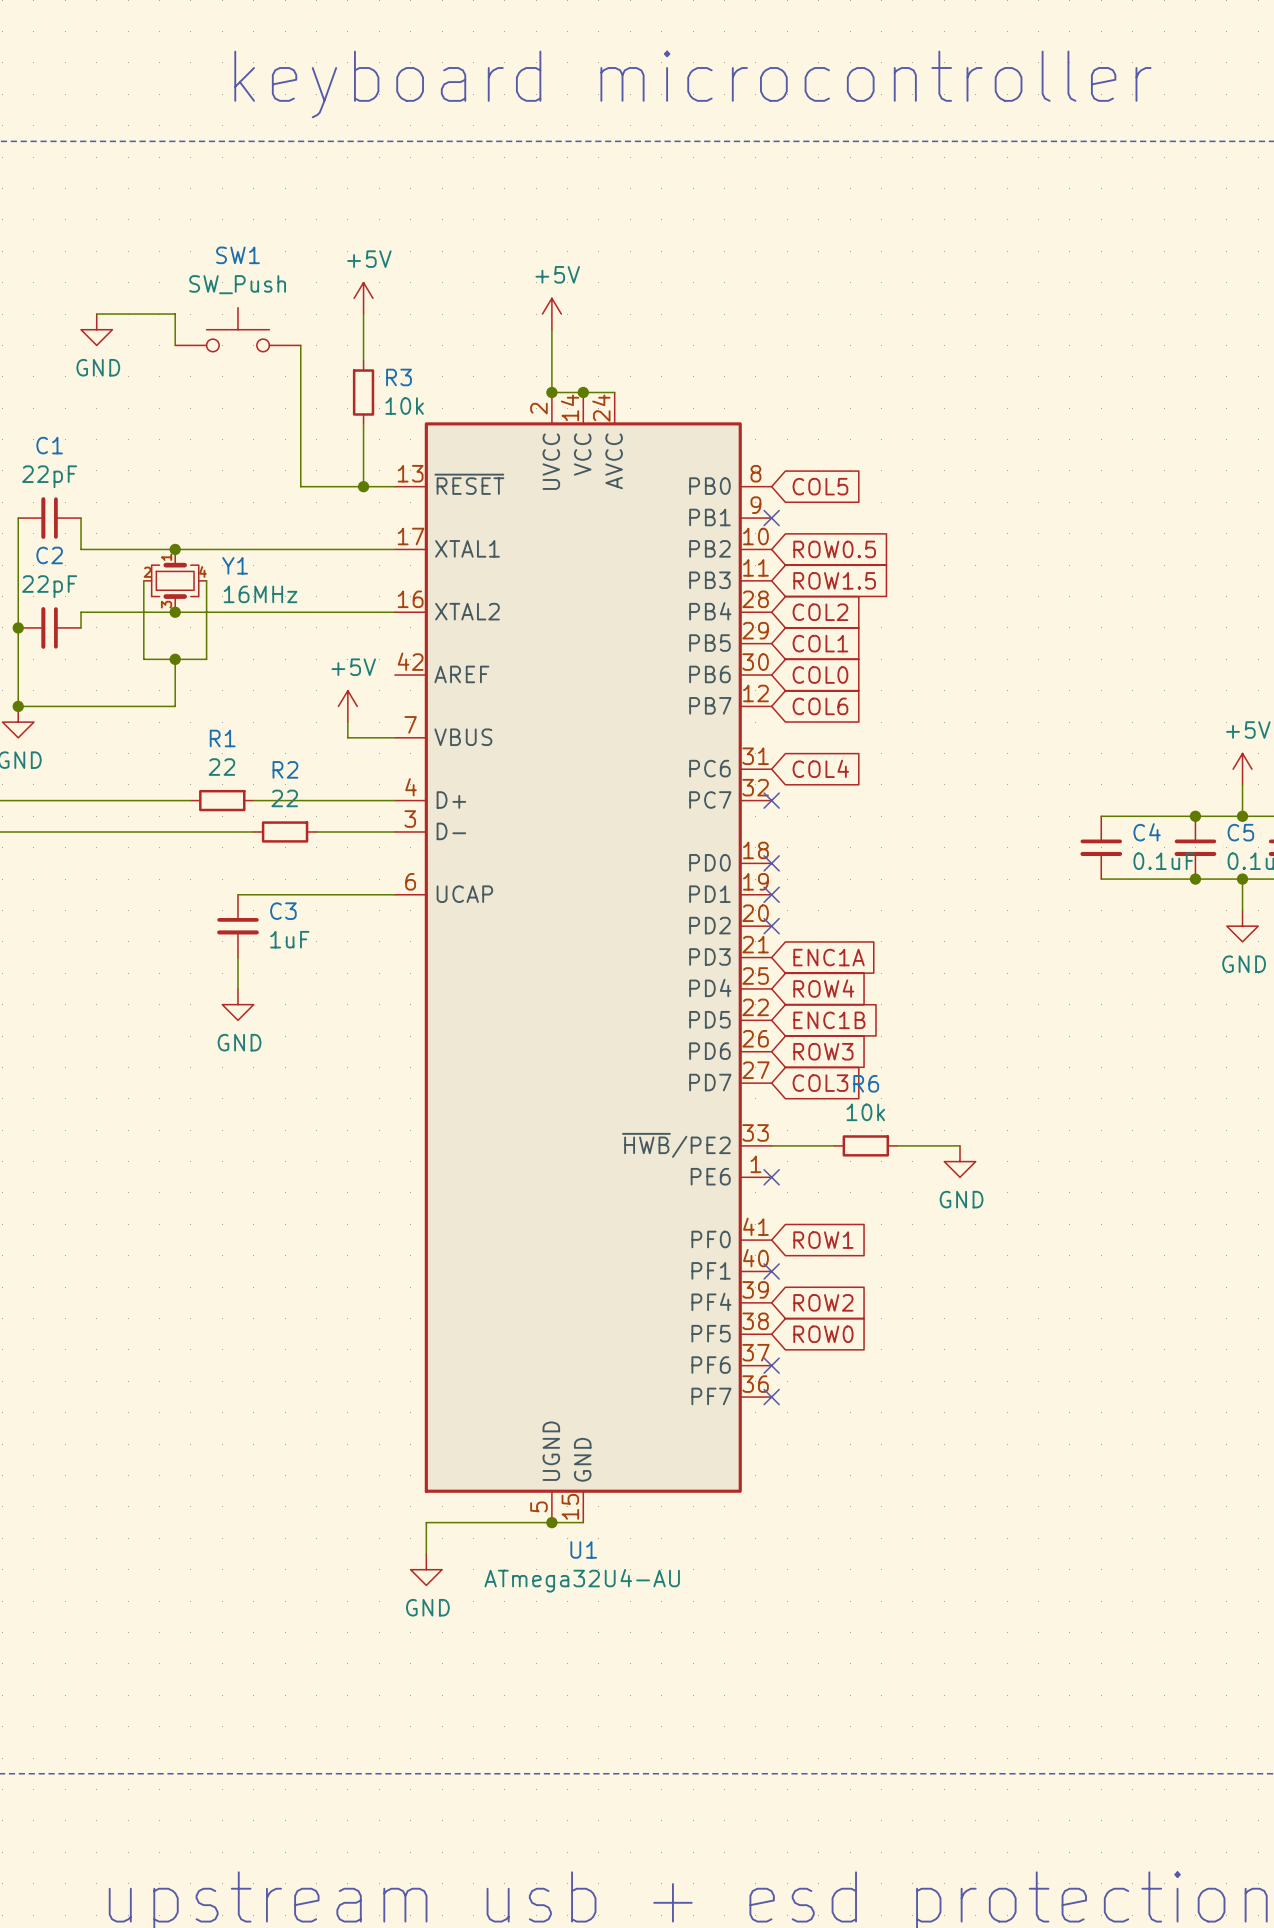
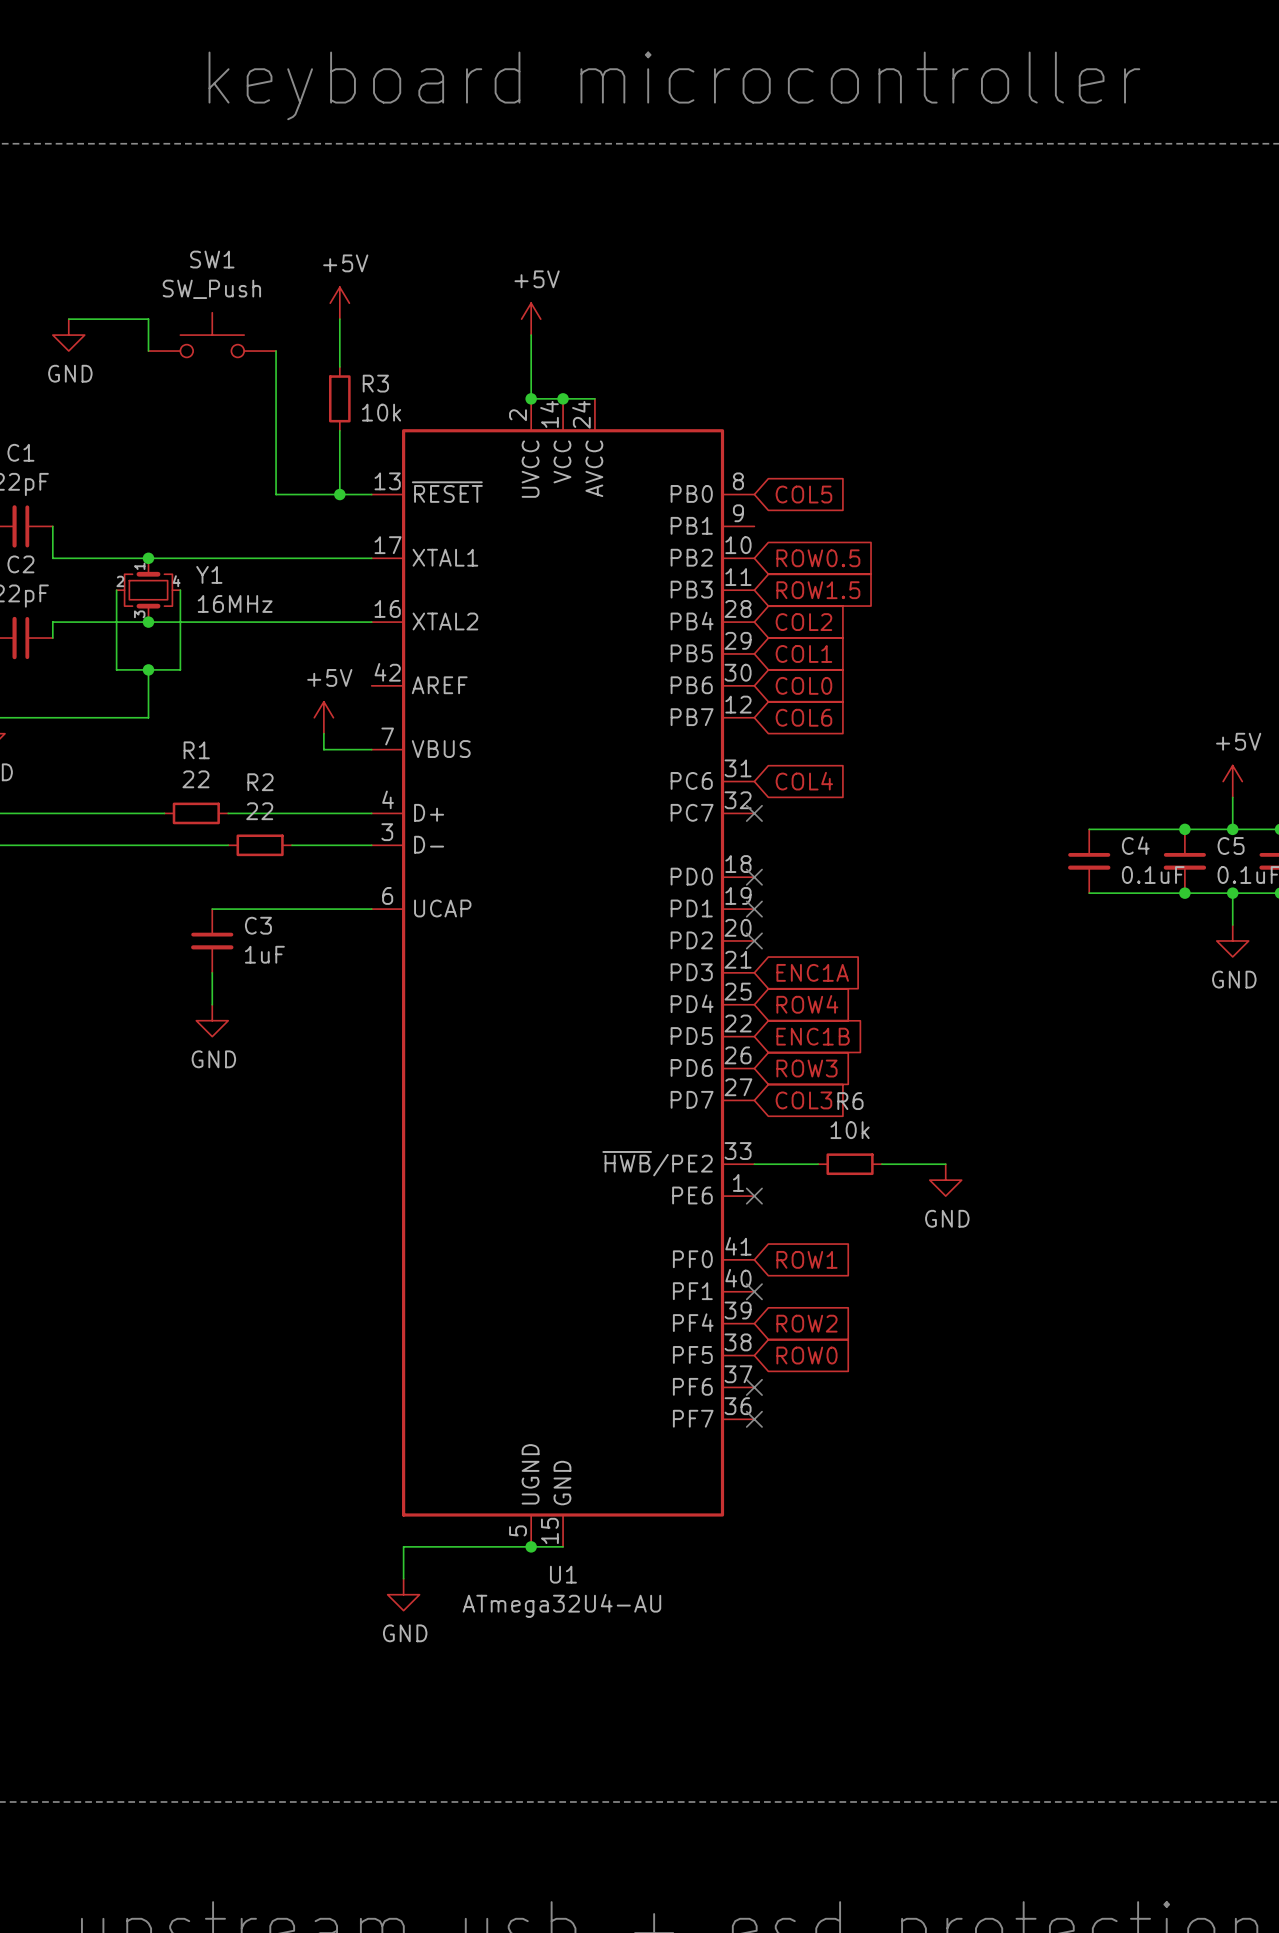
no-connect mark: (771, 518) -> none

